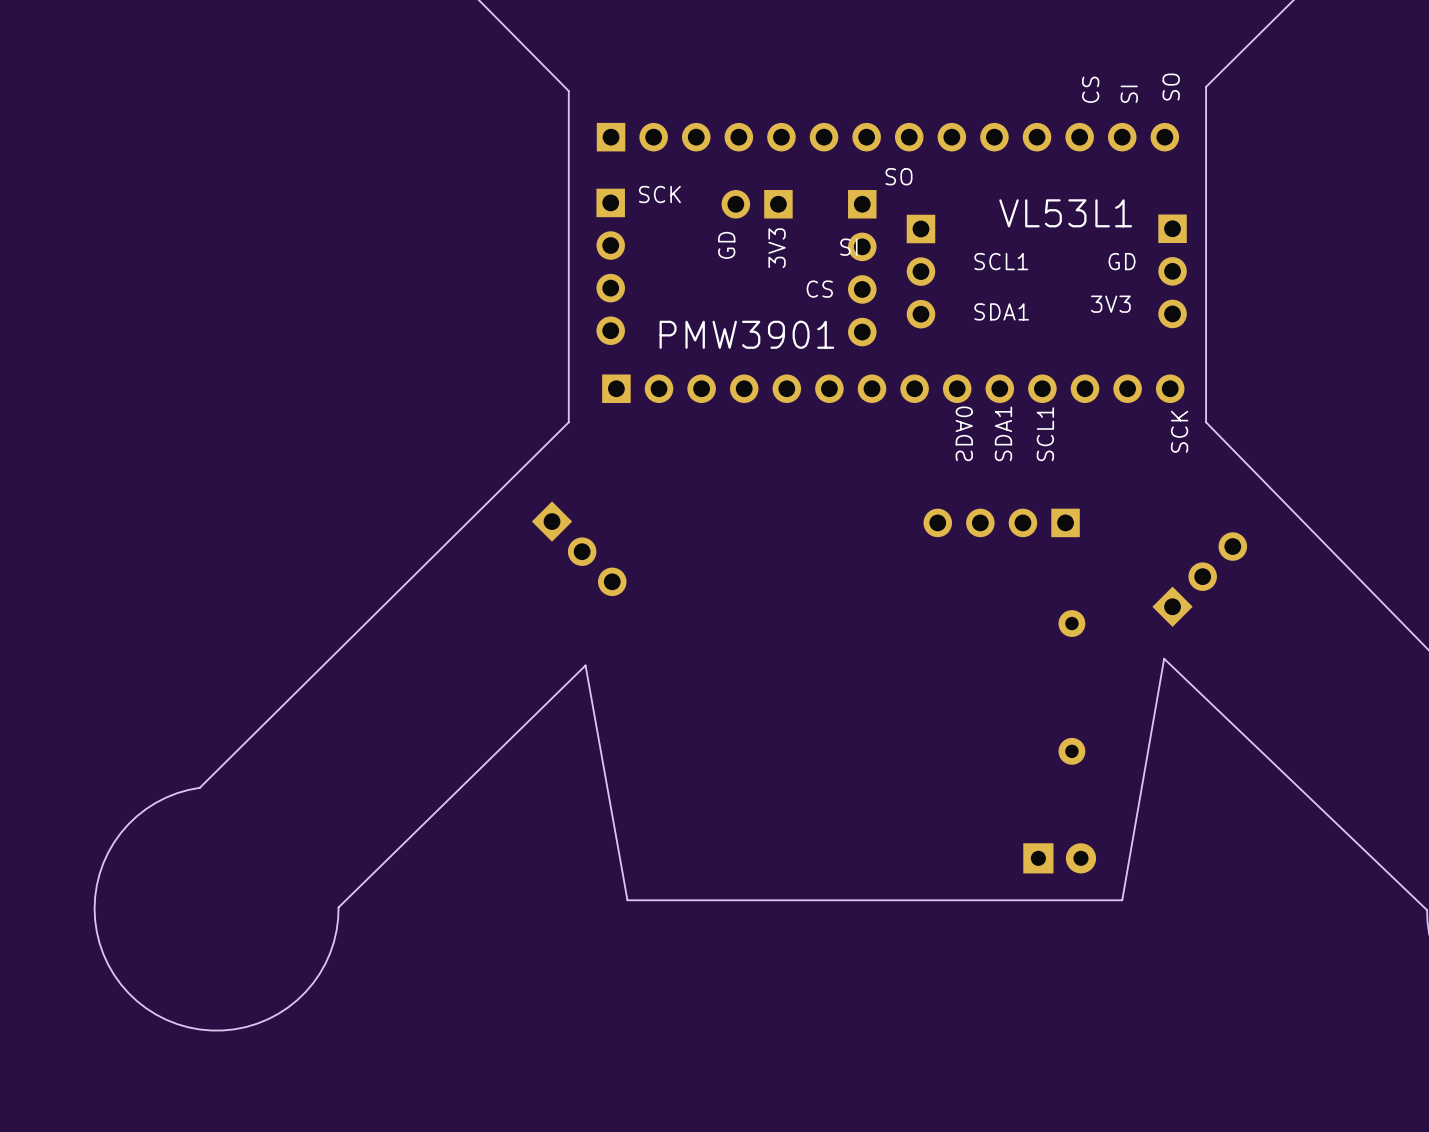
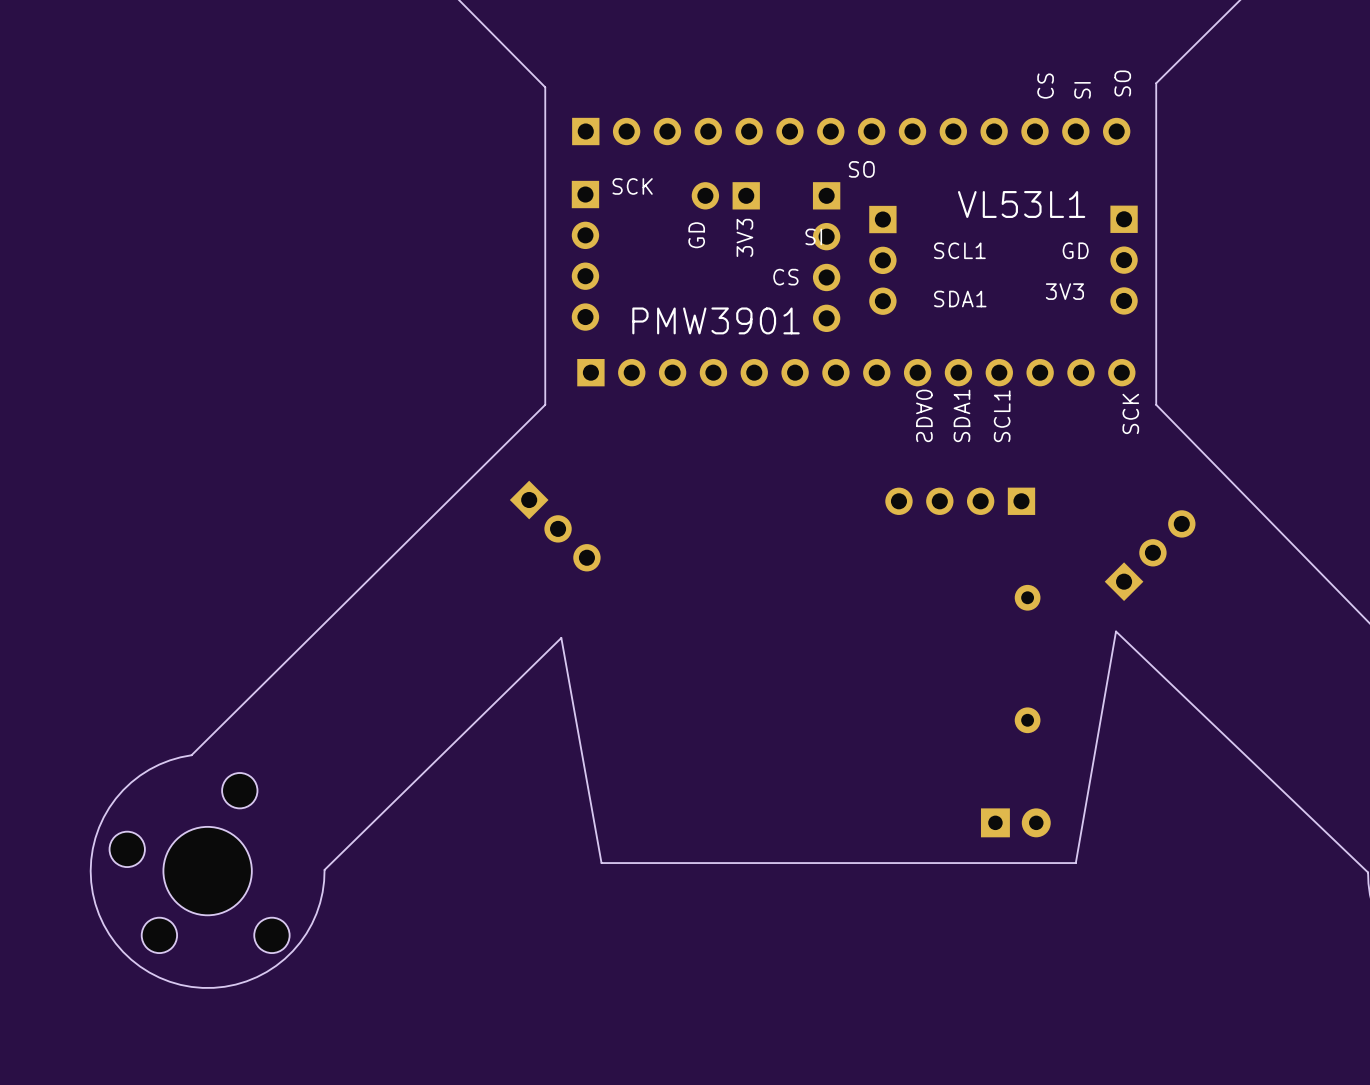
part: none -> (239, 790)
part: none -> (127, 849)
part: none -> (207, 871)
part: none -> (159, 935)
part: none -> (271, 935)

